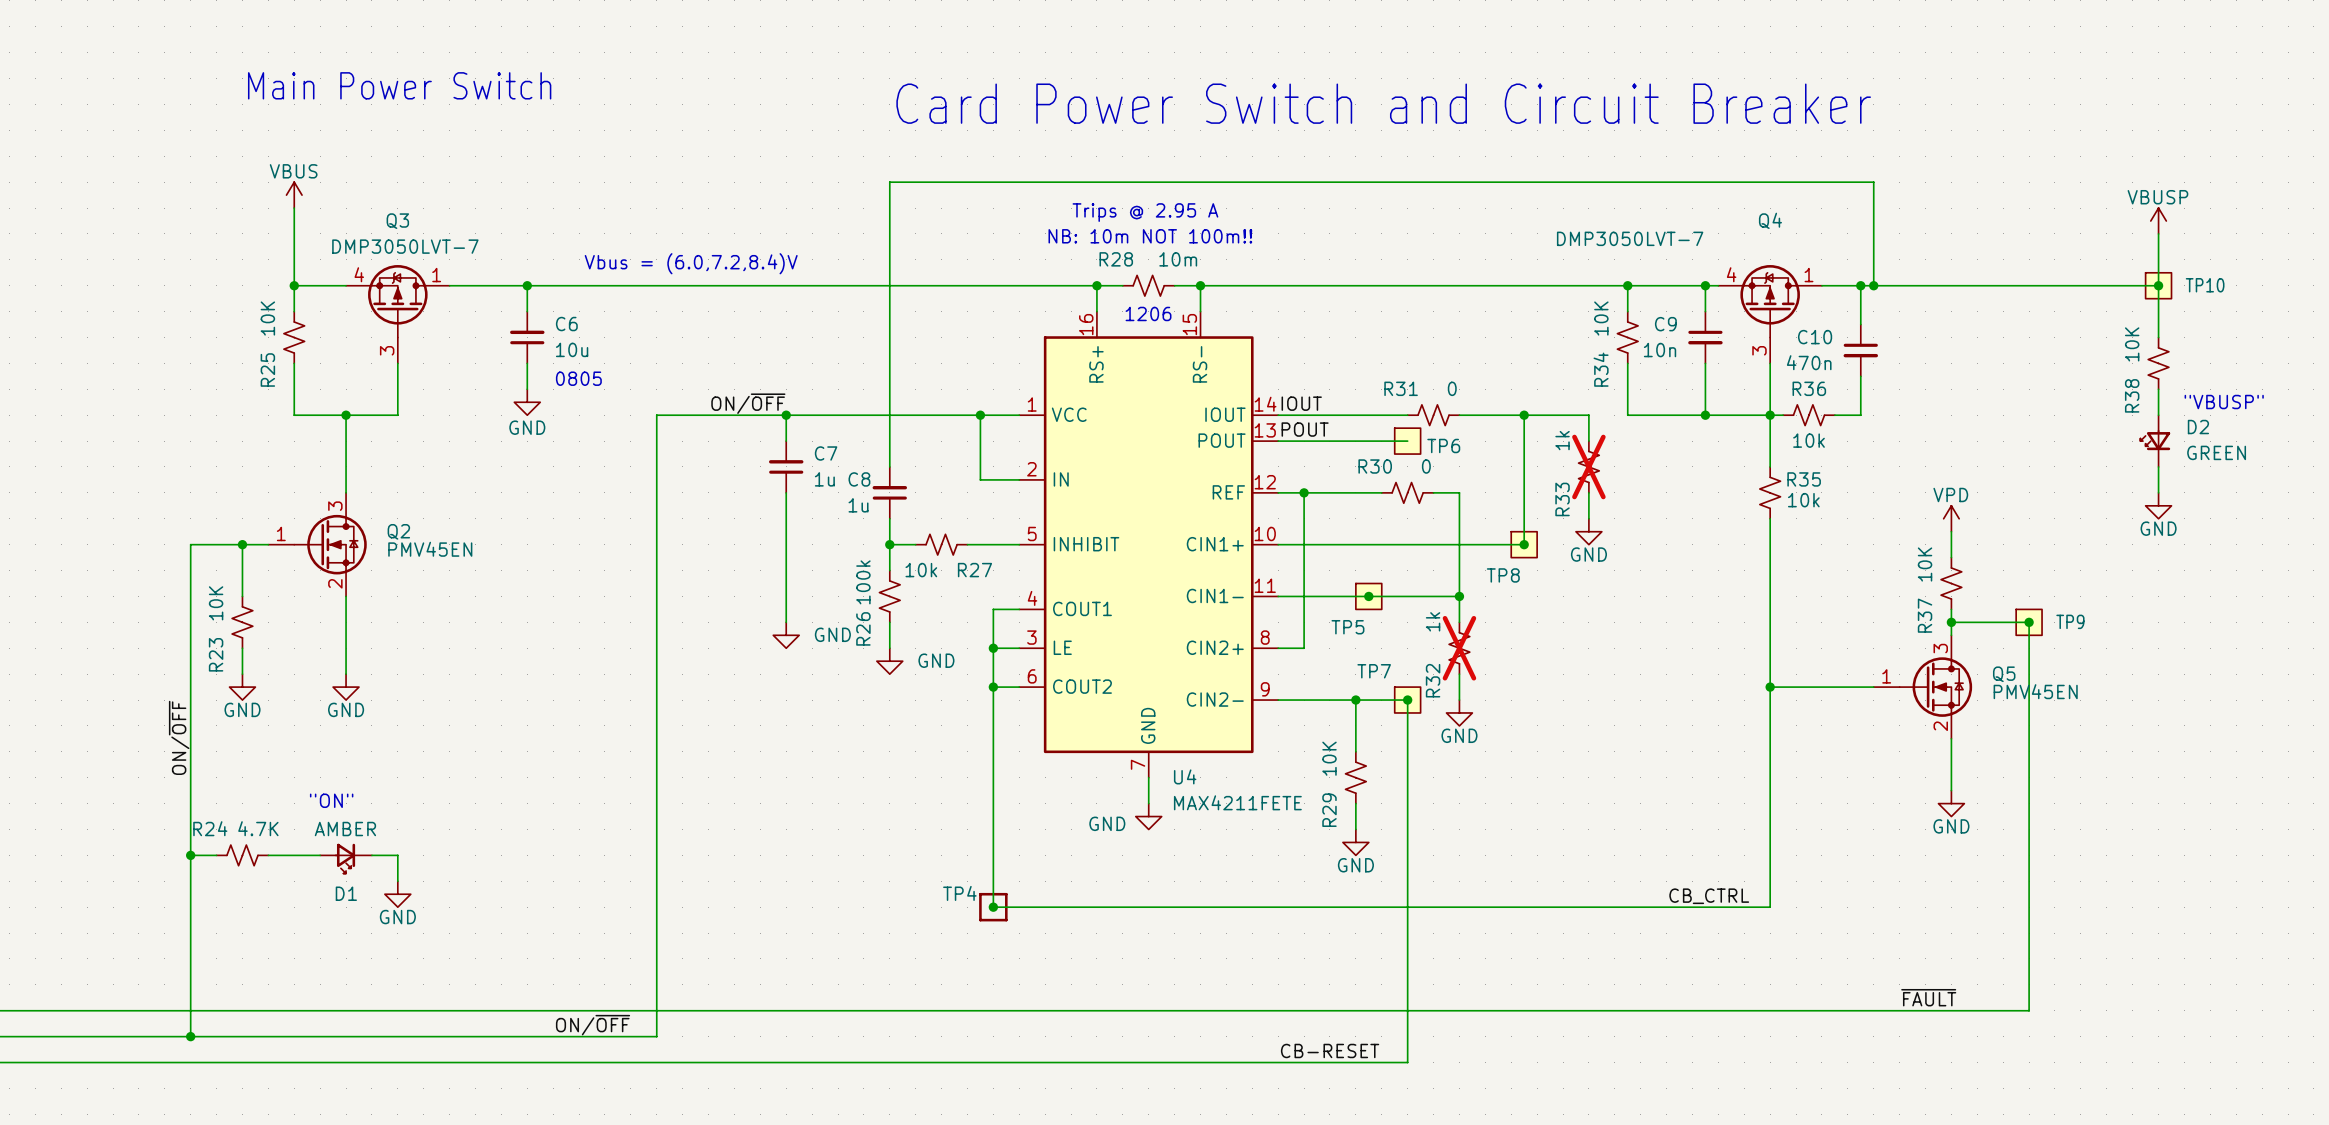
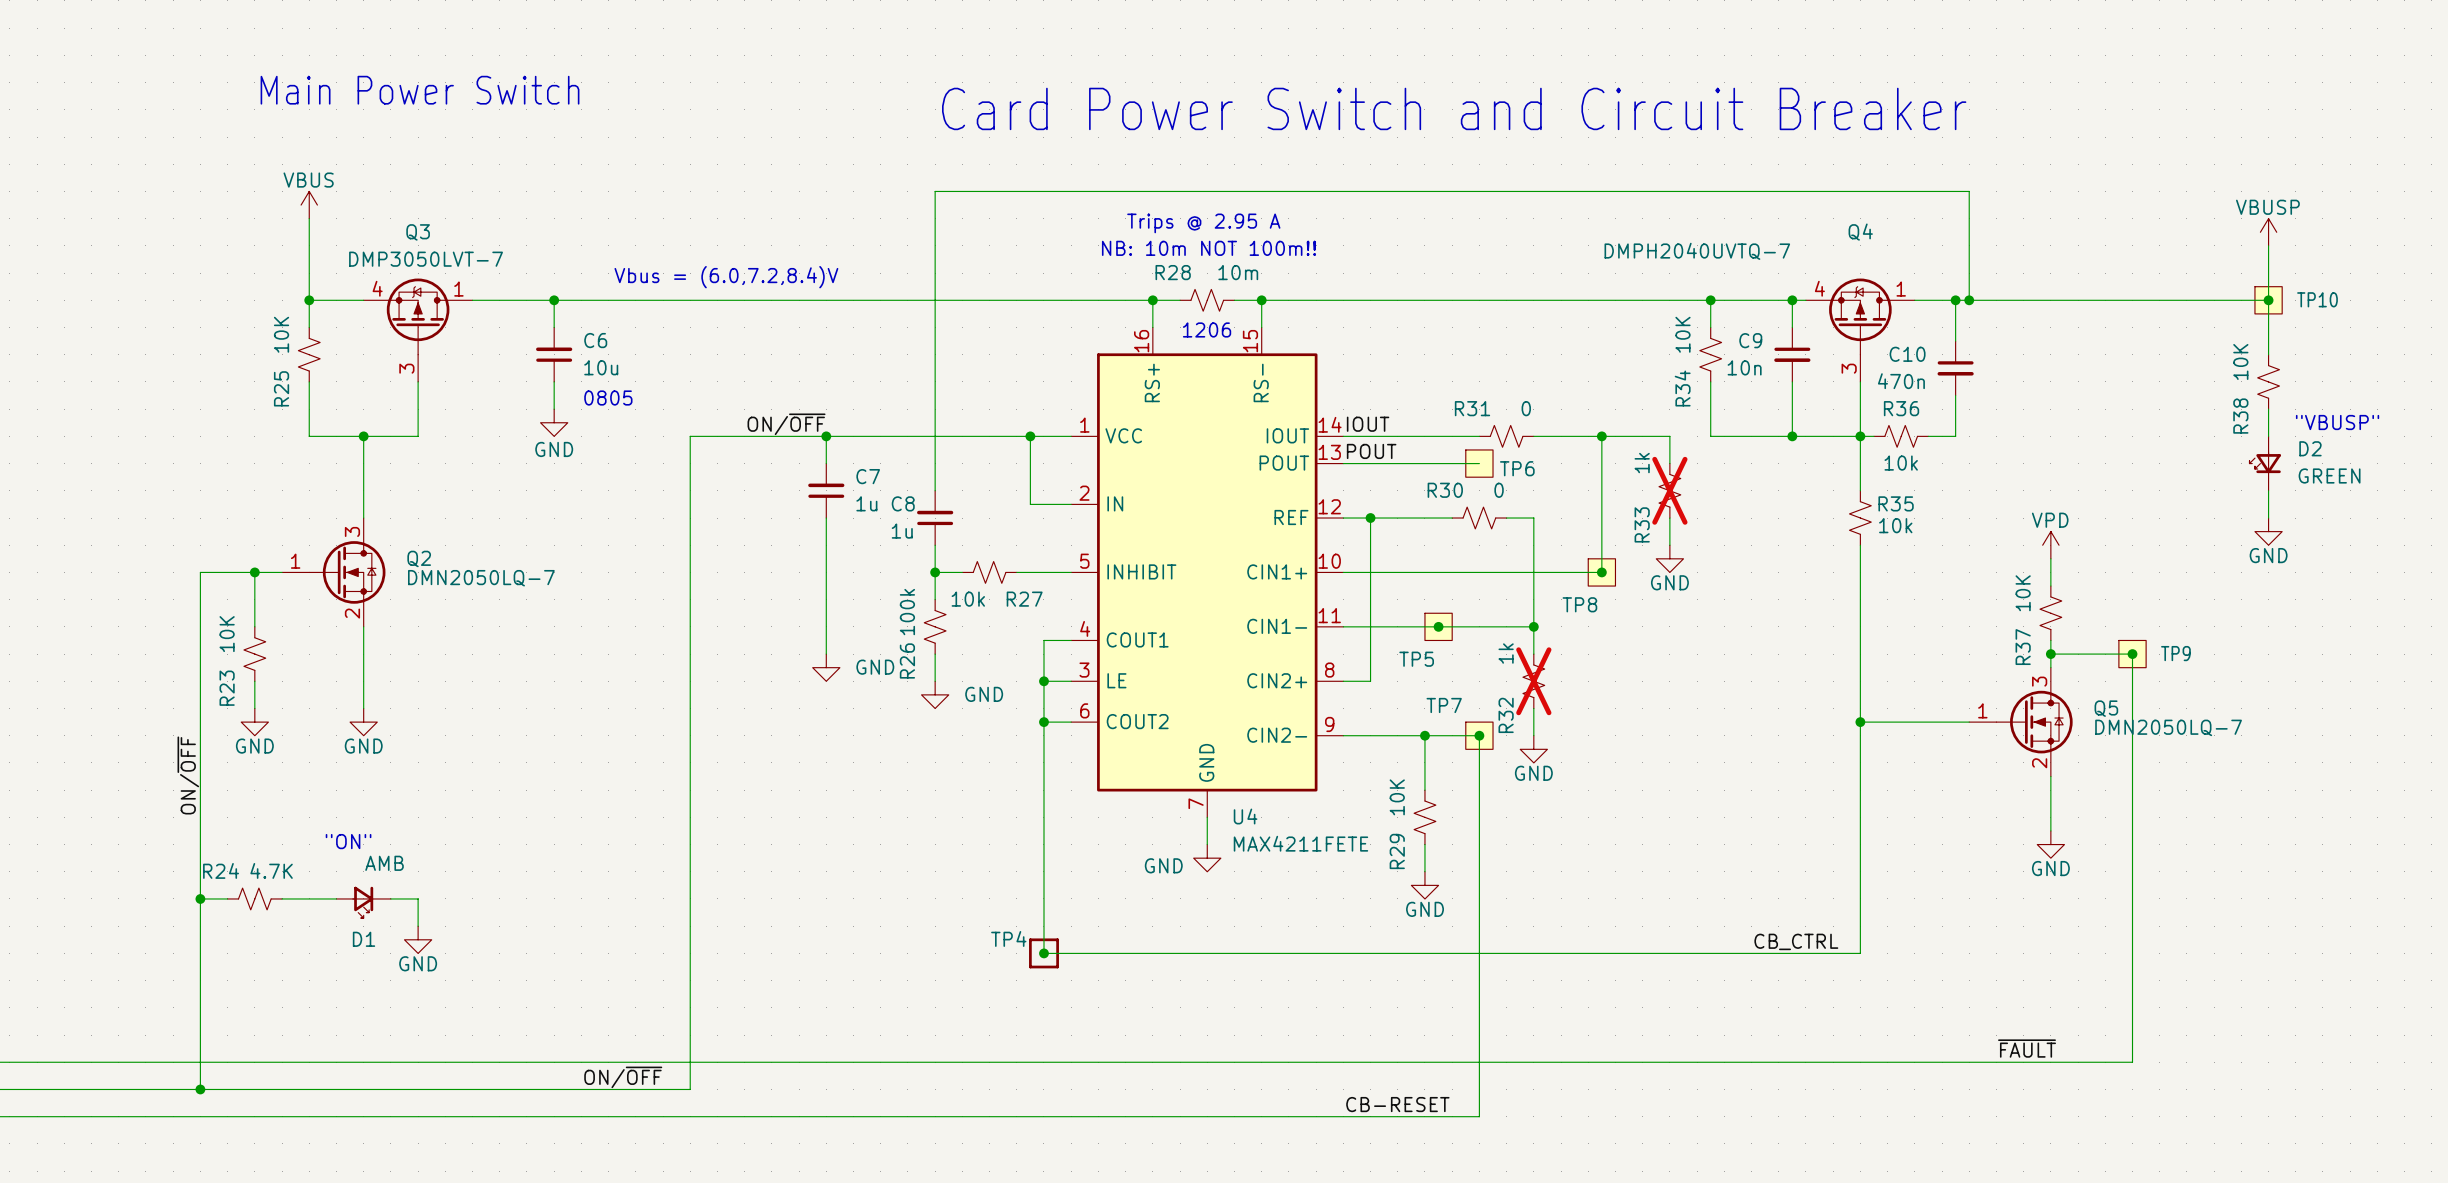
Q4 value: DMP3050LVT-7 (1630, 238) -> DMPH2040UVTQ-7 (1697, 251)
Q2 value: PMV45EN (430, 549) -> DMN2050LQ-7 (481, 578)
Q5 value: PMV45EN (2035, 691) -> DMN2050LQ-7 (2168, 727)
D1 value: AMBER (345, 829) -> AMB (384, 863)

